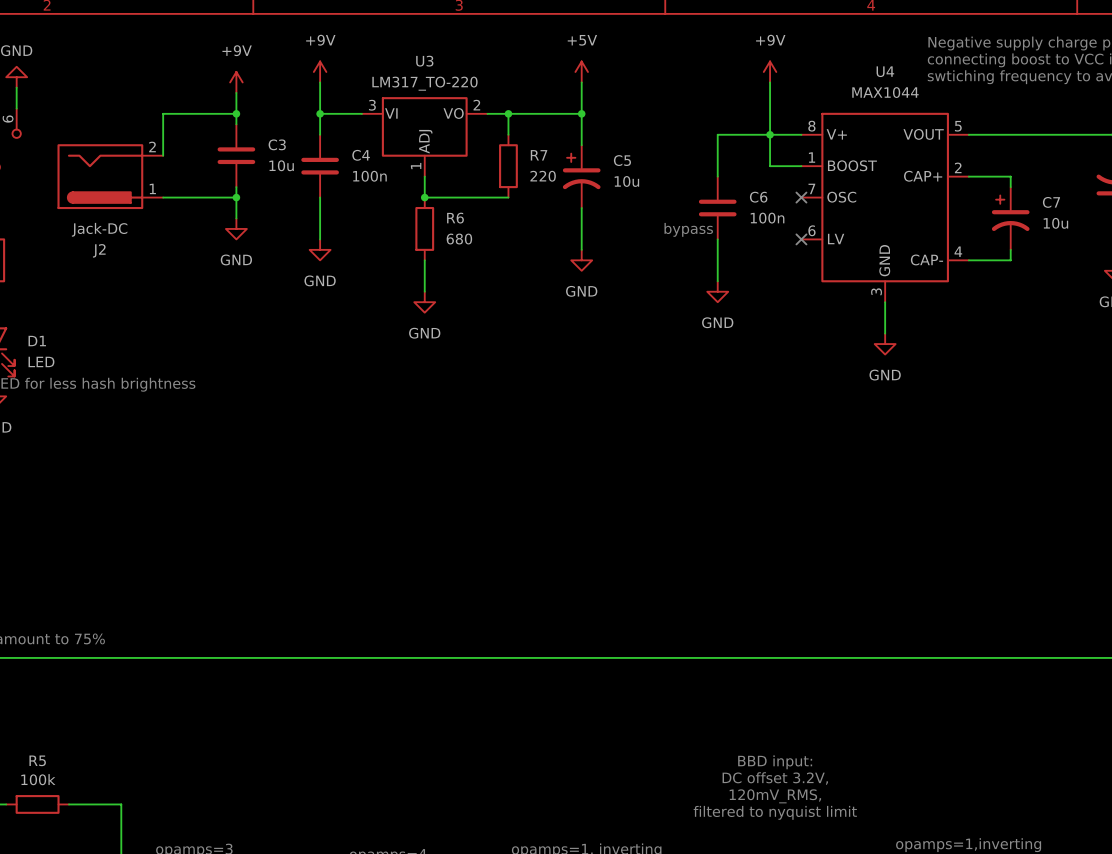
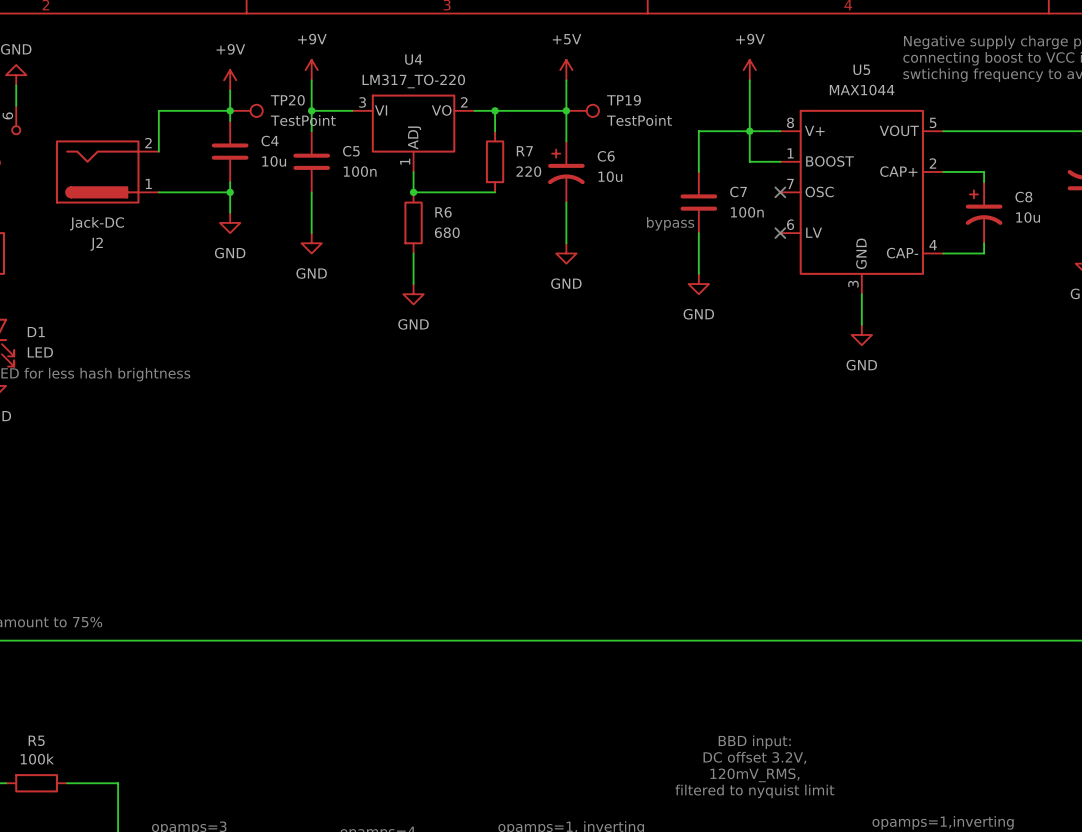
U3 name: U3 (424, 61) -> U4 (413, 59)
U4 name: U4 (885, 71) -> U5 (861, 69)
TP20: none -> TestPoint (246, 110)
TP19: none -> TestPoint (582, 110)
C3 name: C3 (277, 144) -> C4 (270, 141)
C4 name: C4 (361, 155) -> C5 (351, 151)
C5 name: C5 (622, 160) -> C6 (606, 156)
C6 name: C6 (758, 197) -> C7 (738, 191)
C7 name: C7 (1051, 202) -> C8 (1023, 197)

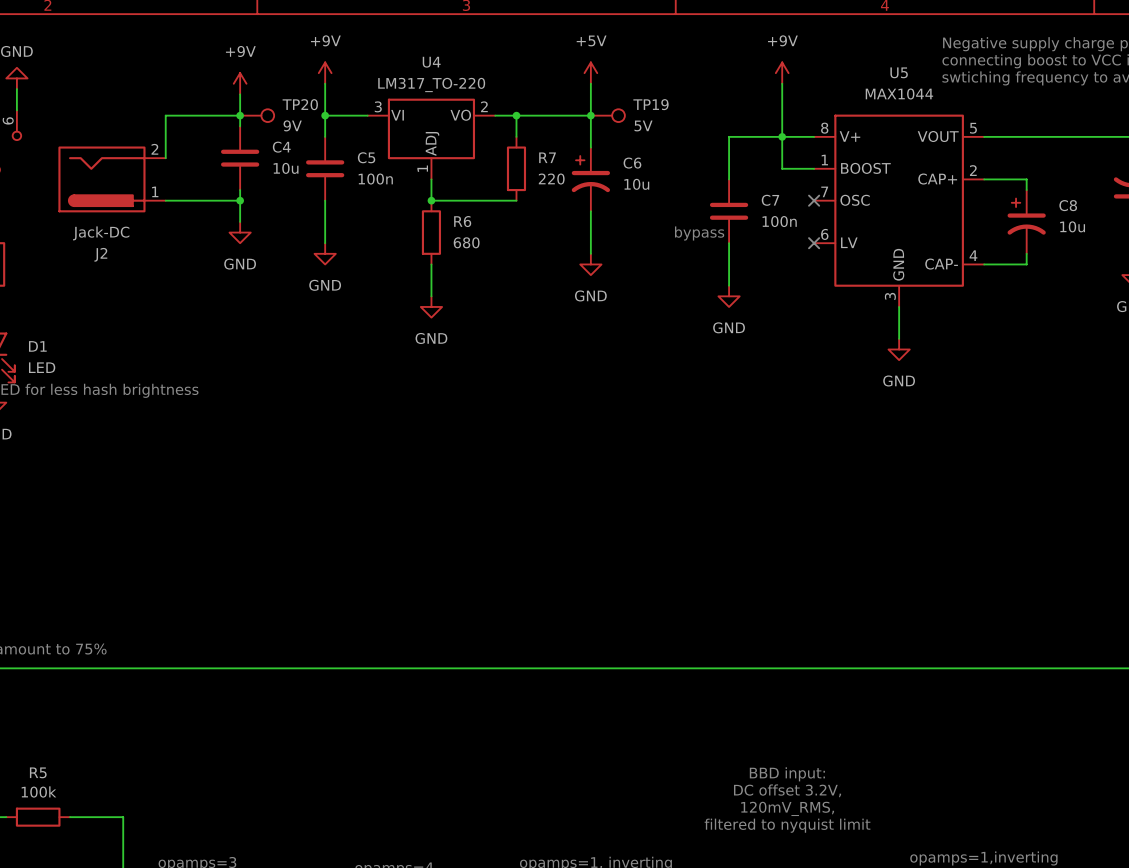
TP20 value: TestPoint (303, 120) -> 9V (292, 125)
TP19 value: TestPoint (639, 120) -> 5V (643, 125)

